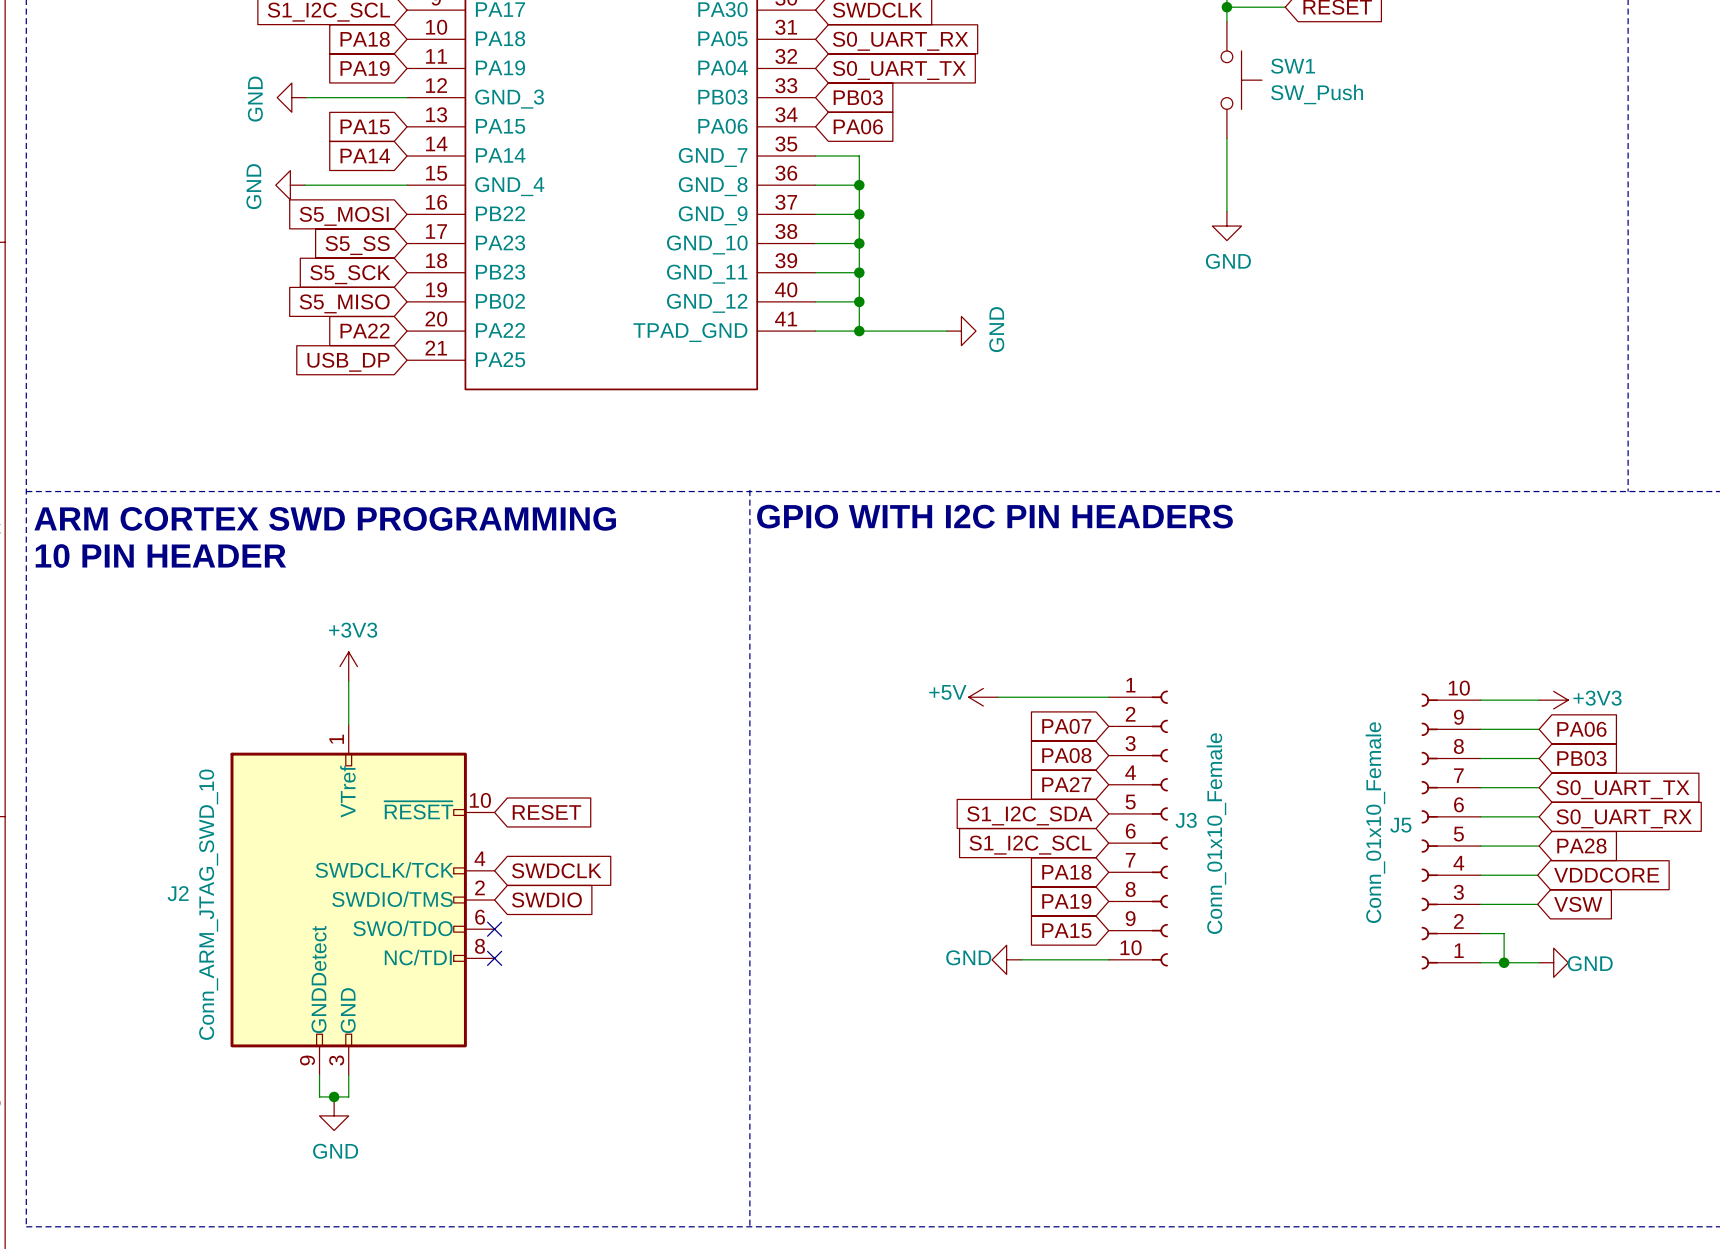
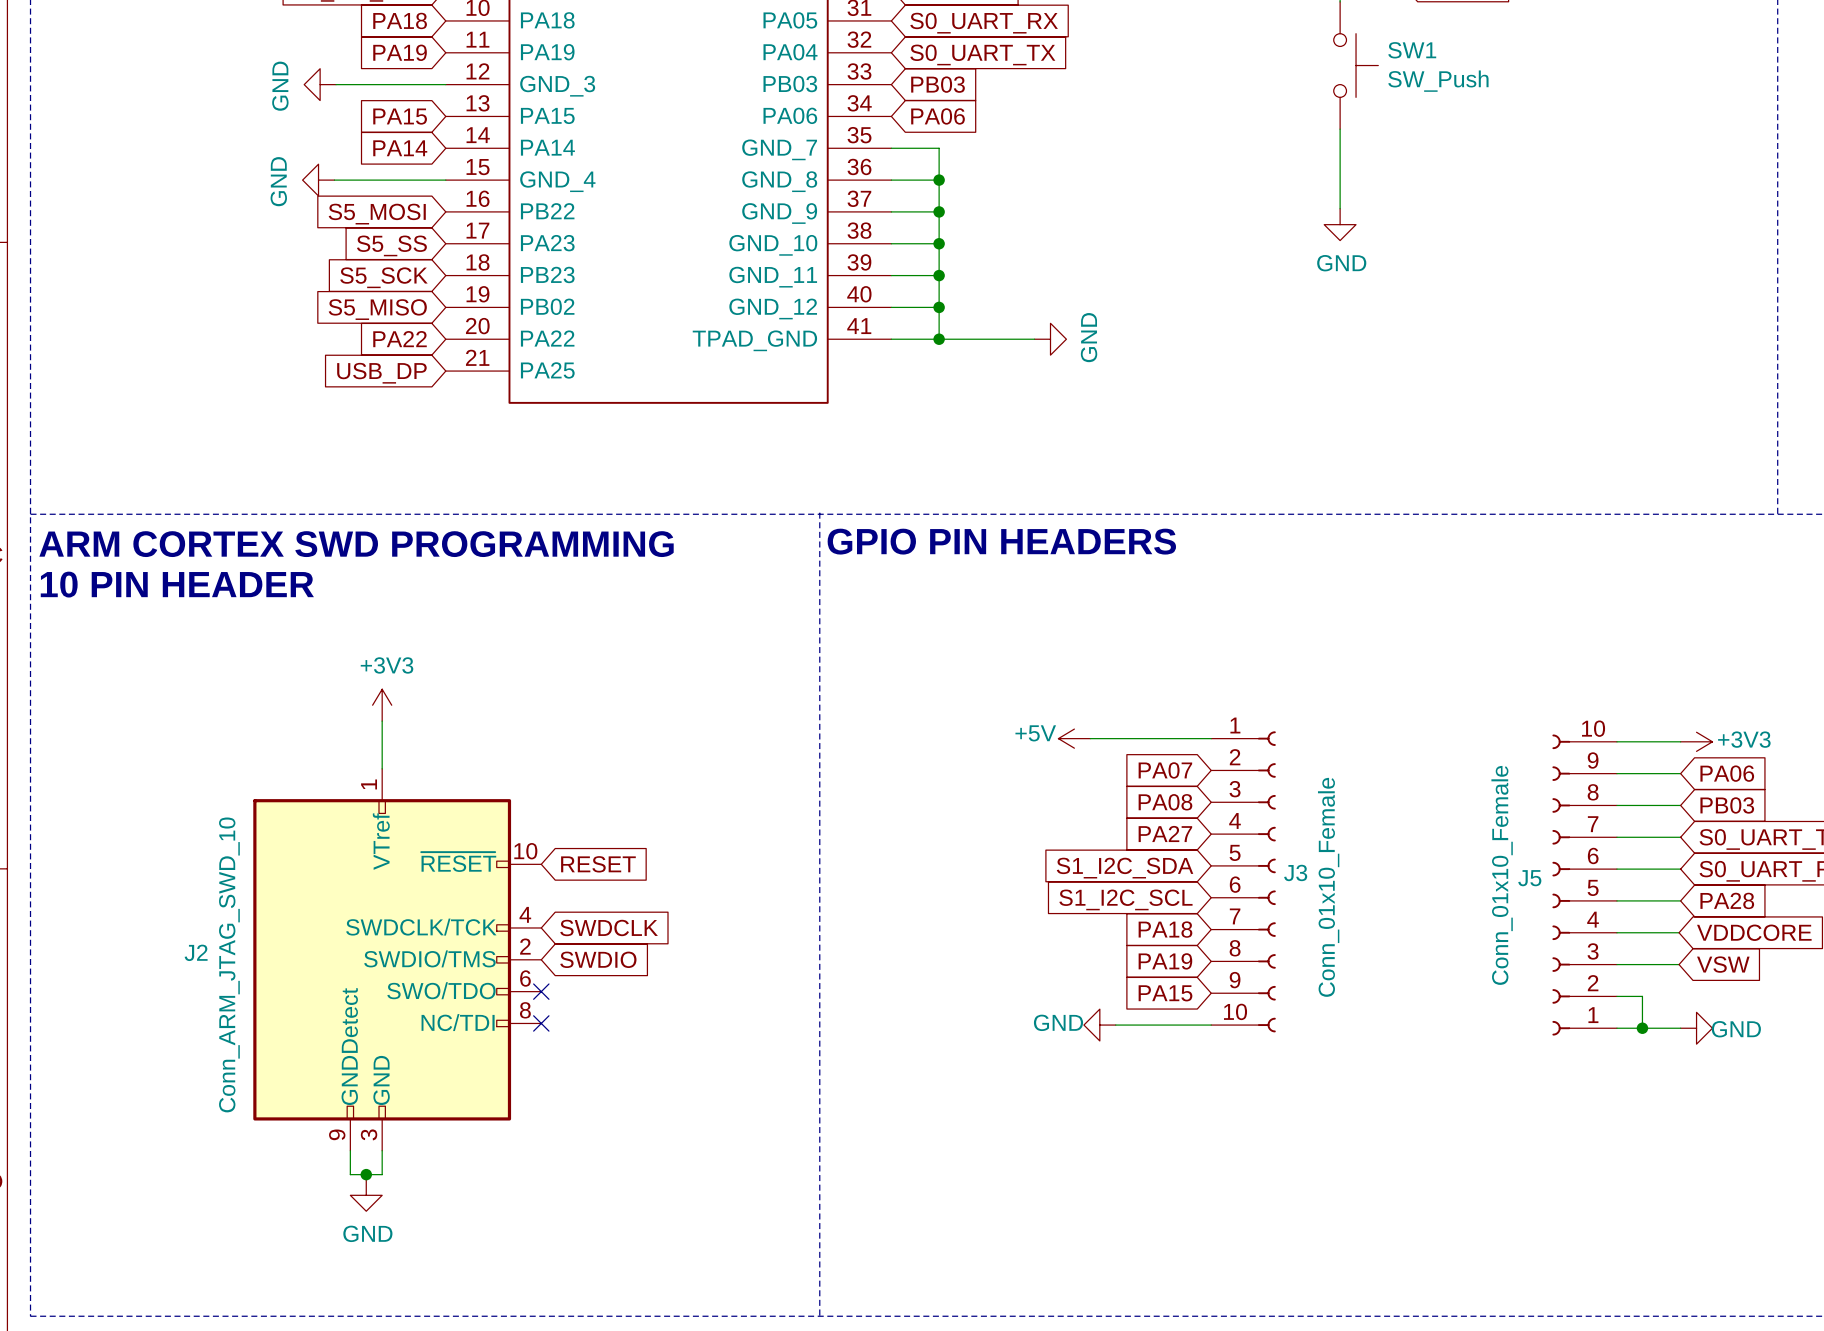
text: GPIO WITH I2C PIN HEADERS (994, 516) -> GPIO PIN HEADERS (1001, 541)

